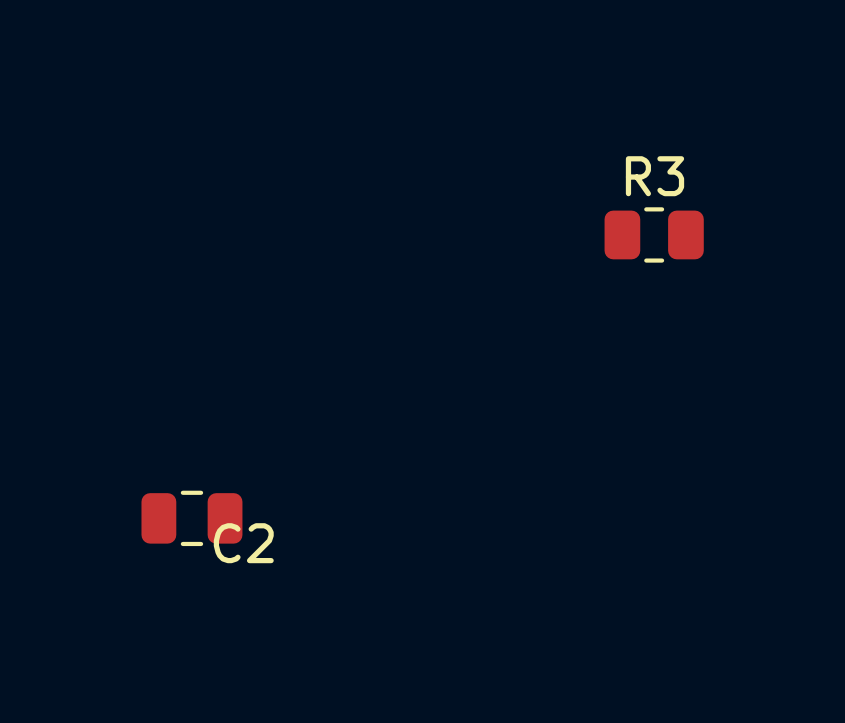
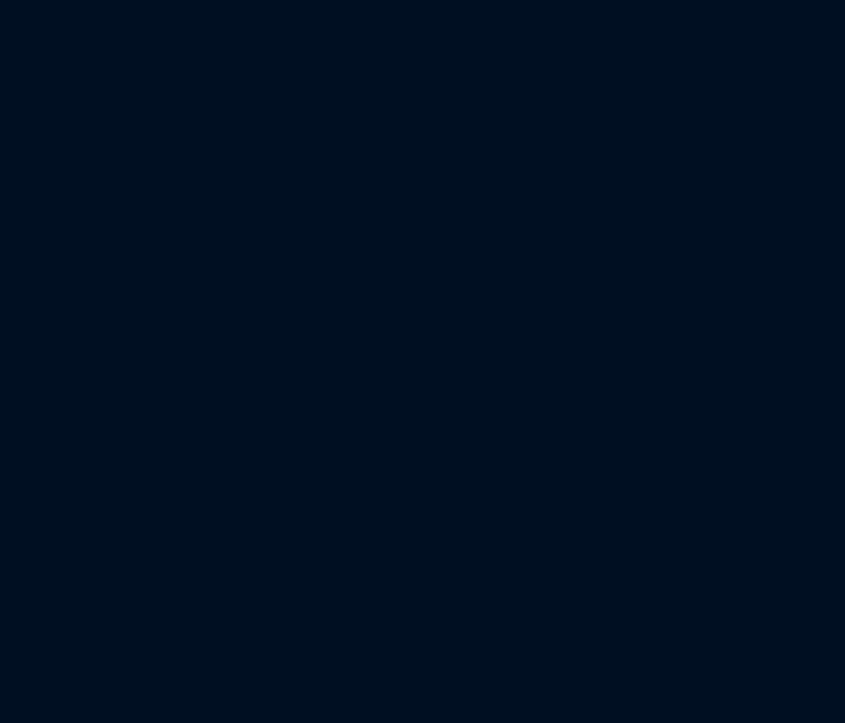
R3: (654, 234) -> none
C2: (191, 518) -> none

